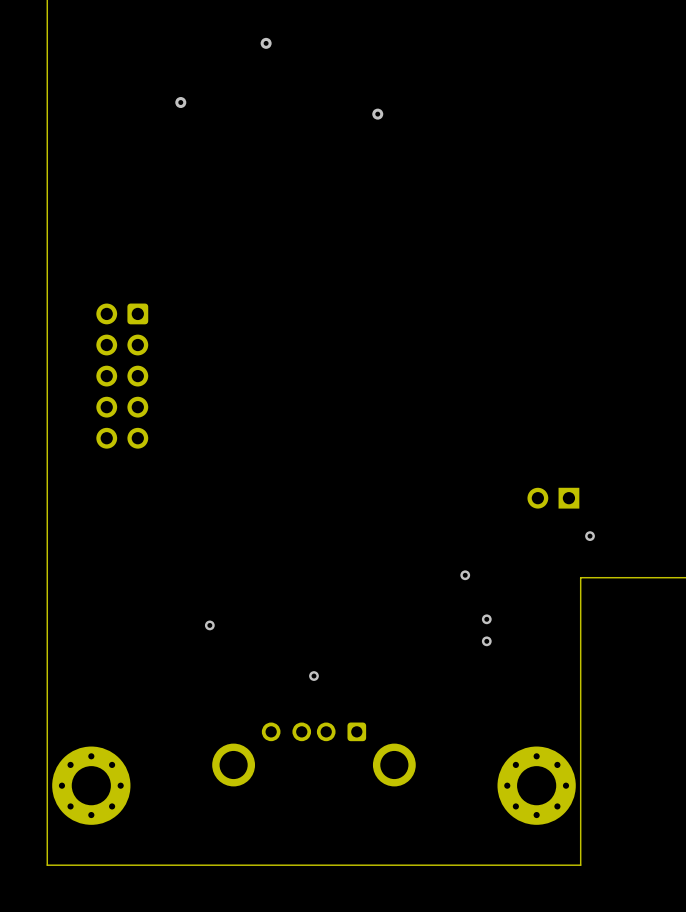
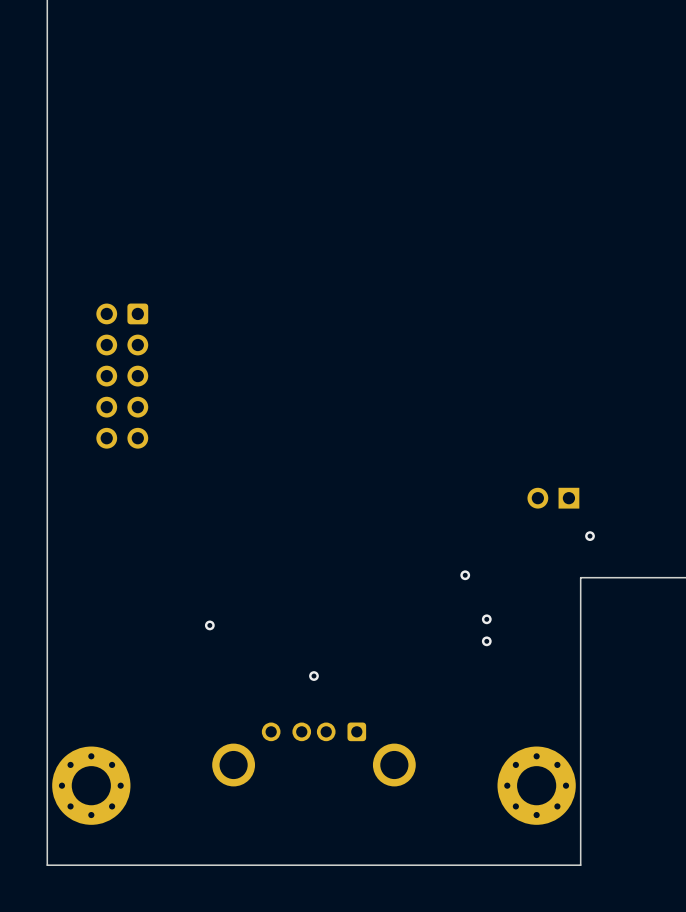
via: (266, 43) -> none
via: (180, 102) -> none
via: (377, 114) -> none

